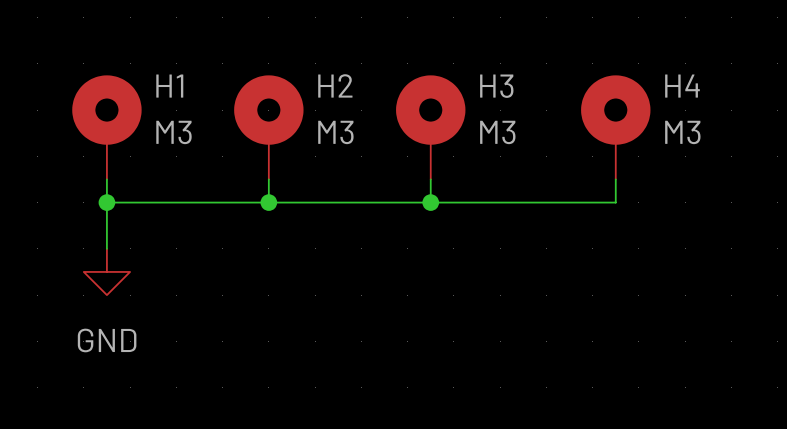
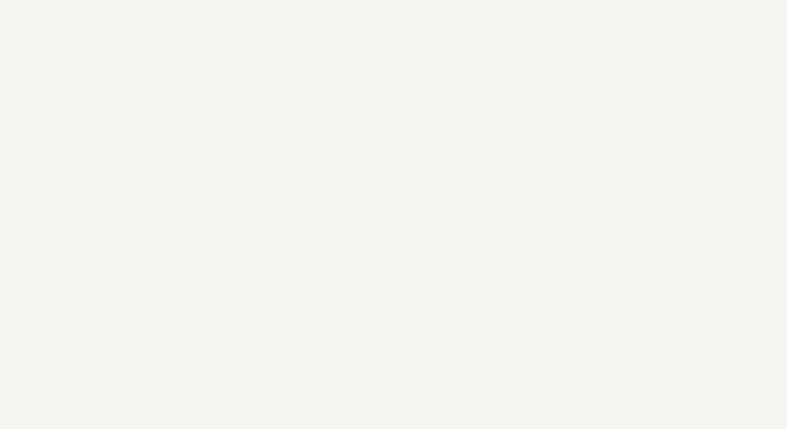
H1: M3 (106, 127) -> none
H2: M3 (268, 127) -> none
H3: M3 (430, 127) -> none
H4: M3 (615, 127) -> none
wire: (106, 179) (106, 248) -> none
wire: (268, 179) (268, 202) -> none
wire: (430, 179) (430, 202) -> none
wire: (615, 179) (615, 202) (106, 202) -> none
junction: (106, 202) -> none
junction: (268, 202) -> none
junction: (430, 202) -> none
power symbol: GND (106, 271) -> none

